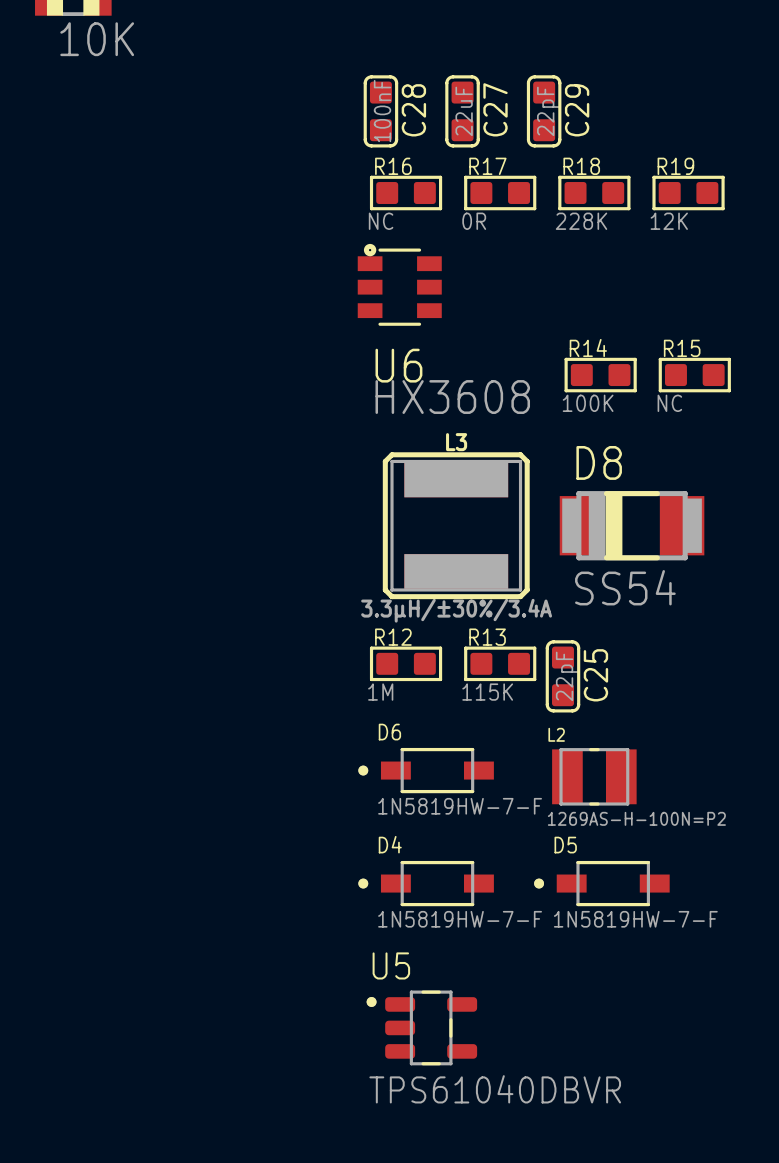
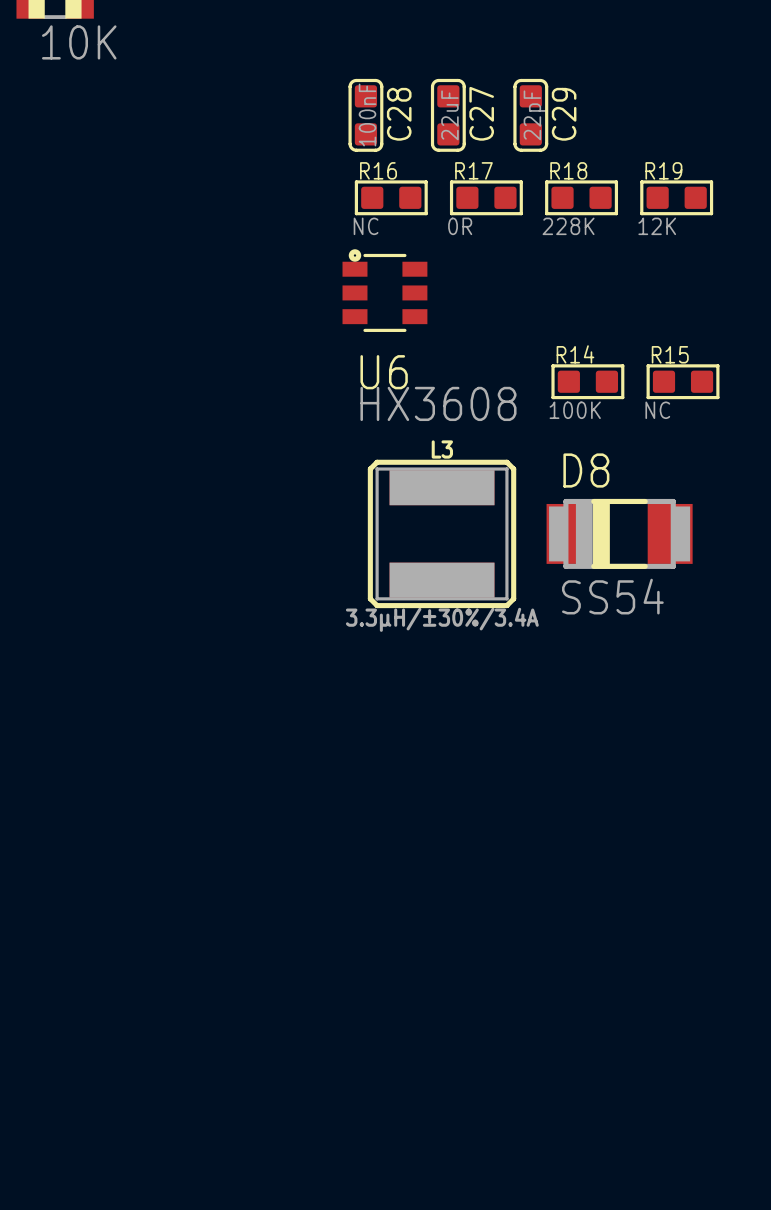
R12: 1M (406, 663) -> none
R13: 115K (500, 663) -> none
C25: 22pF (562, 676) -> none
D6: 1N5819HW-7-F (426, 770) -> none
L2: 1269AS-H-100N=P2 (594, 776) -> none
D4: 1N5819HW-7-F (426, 883) -> none
D5: 1N5819HW-7-F (601, 883) -> none
U5: TPS61040DBVR (421, 1027) -> none

